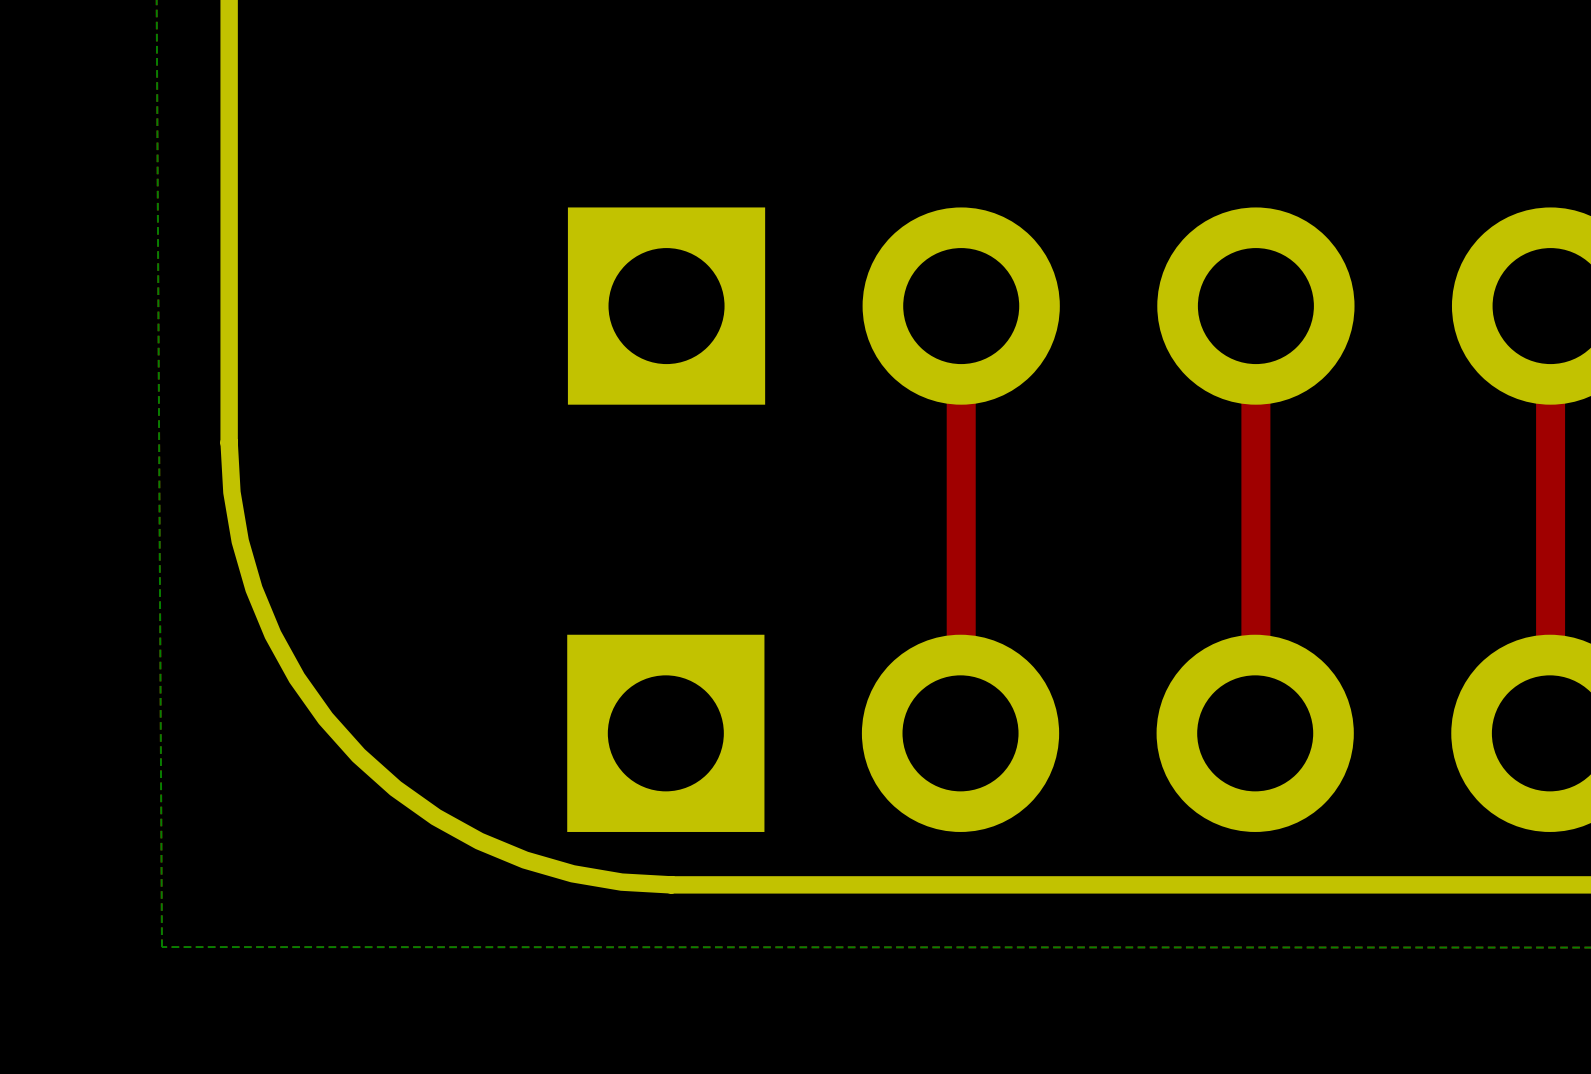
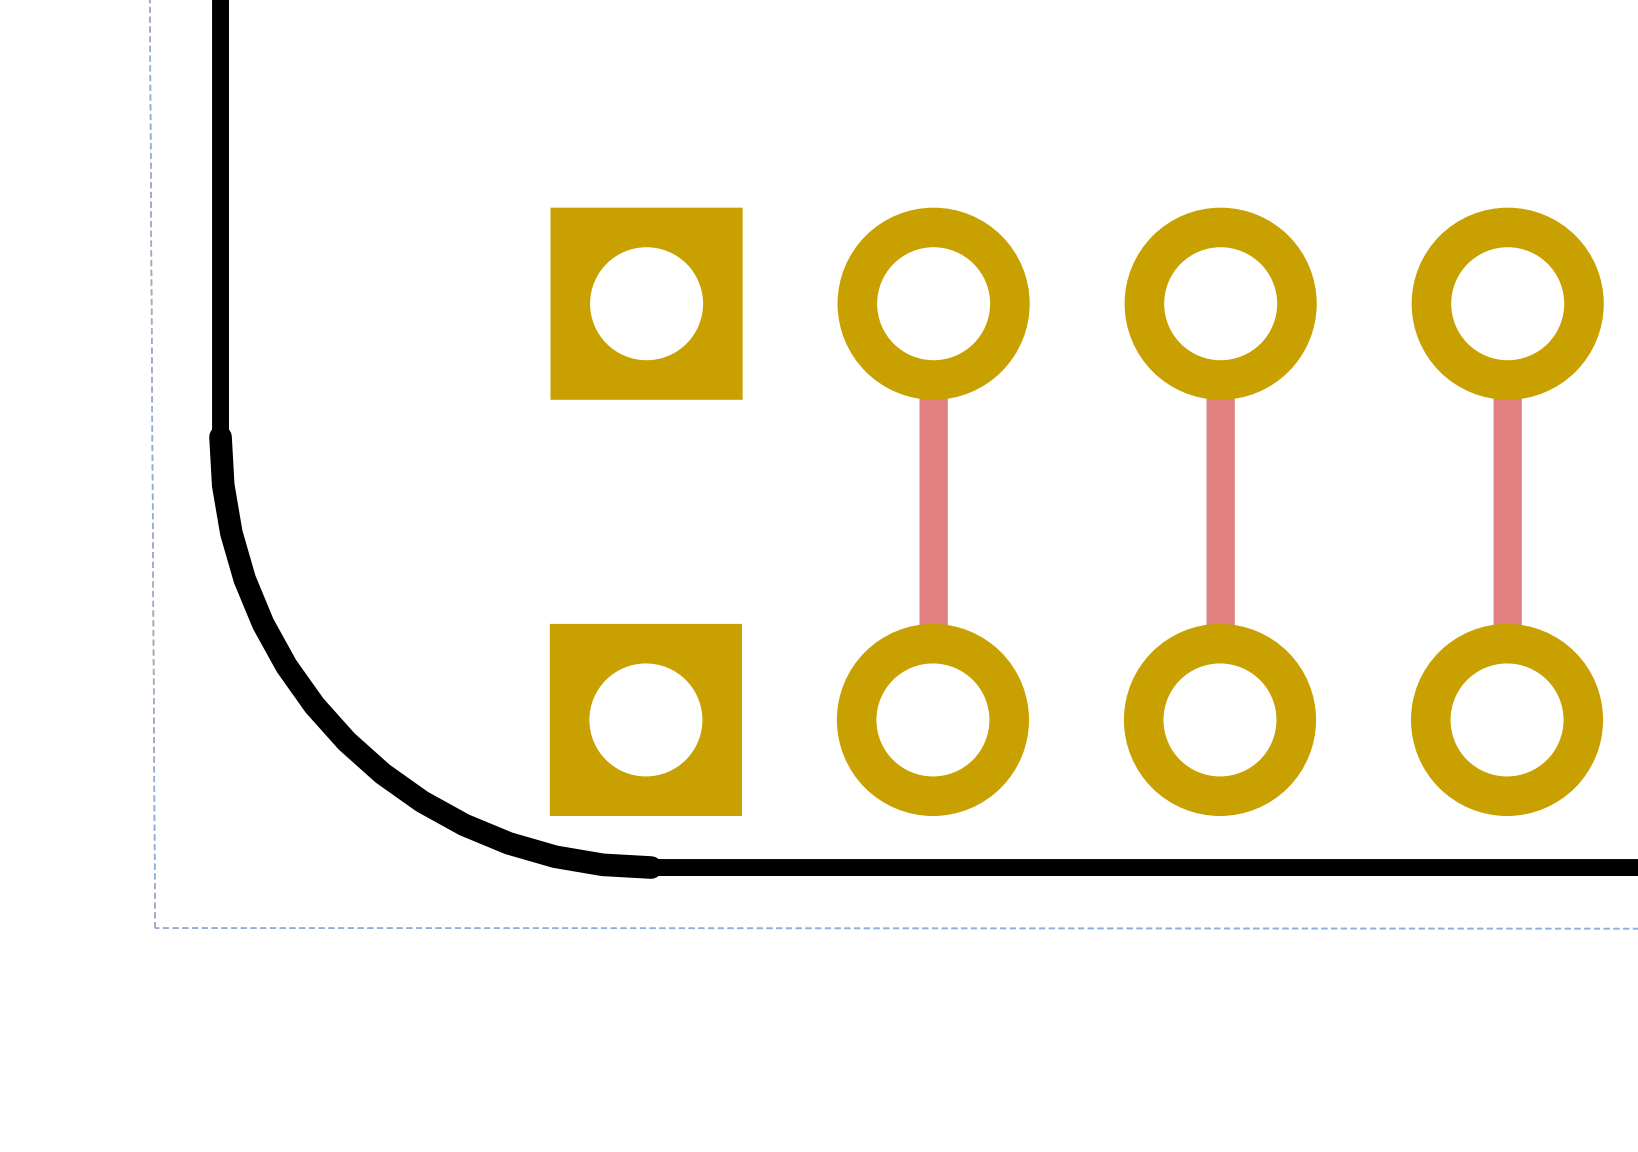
board edge width: thin (229, 442) (231, 492) (240, 541) (253, 588) (272, 634) (296, 678) (325, 718) (358, 755) (395, 788) (436, 817) (479, 841) (525, 860) (572, 873) (621, 882) (671, 884) -> thick (220, 436) (223, 485) (231, 532) (244, 579) (263, 623) (286, 666) (314, 705) (346, 741) (382, 773) (422, 801) (464, 824) (508, 843) (555, 856) (602, 864) (651, 867)

